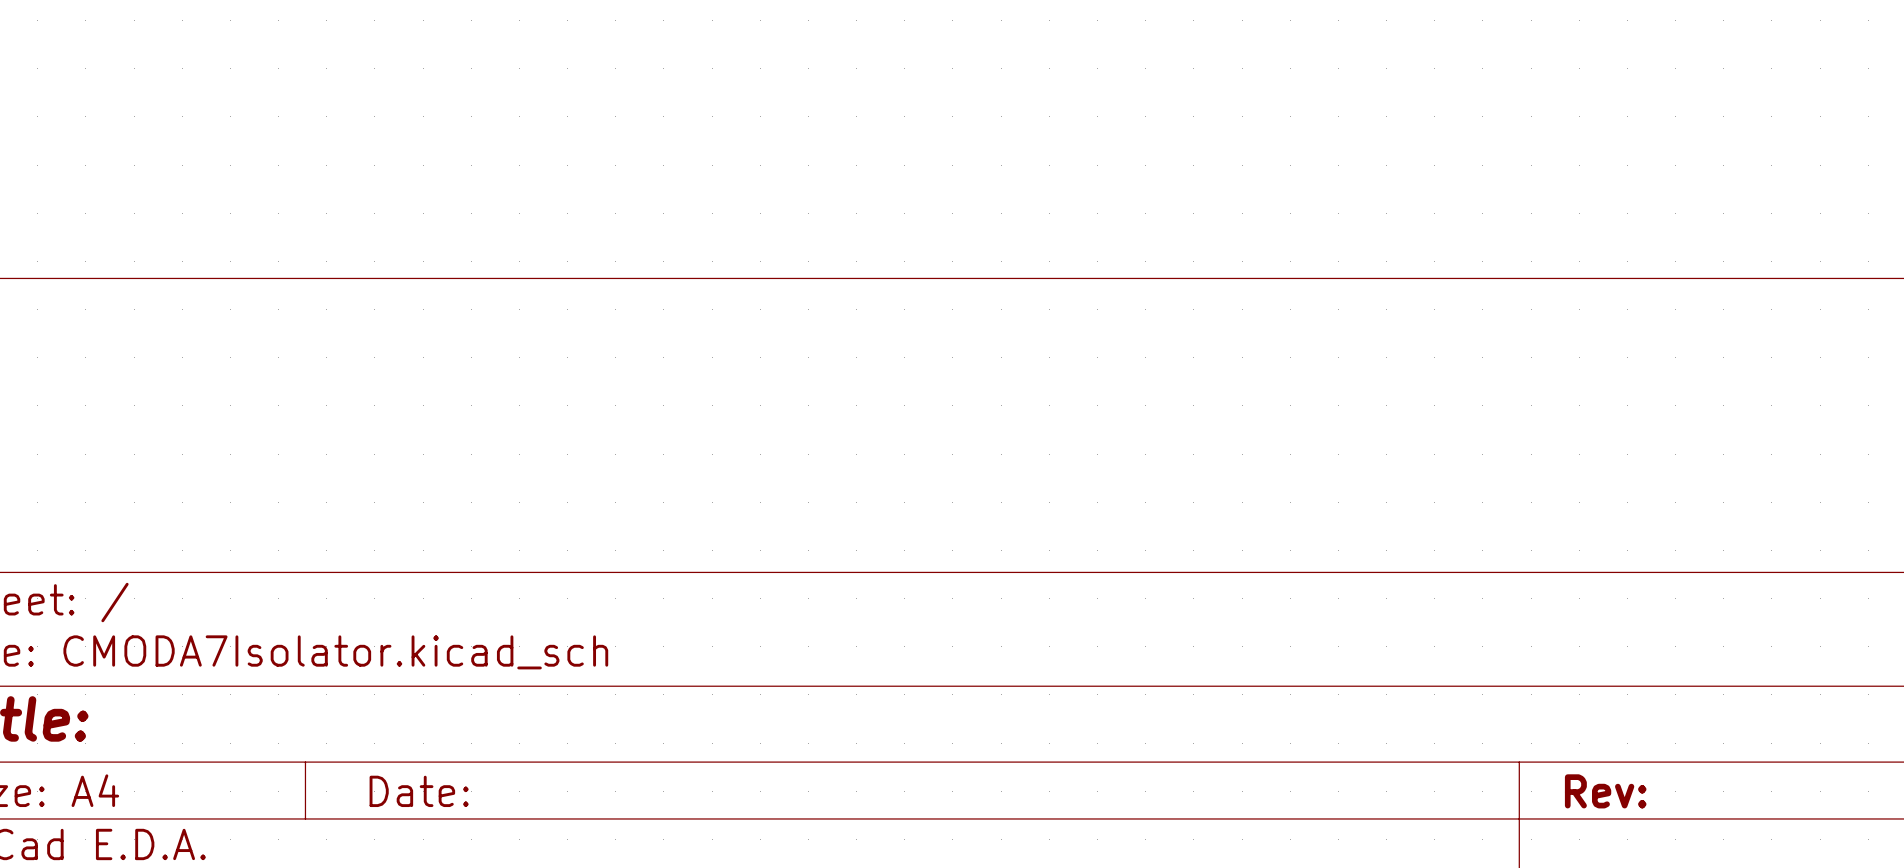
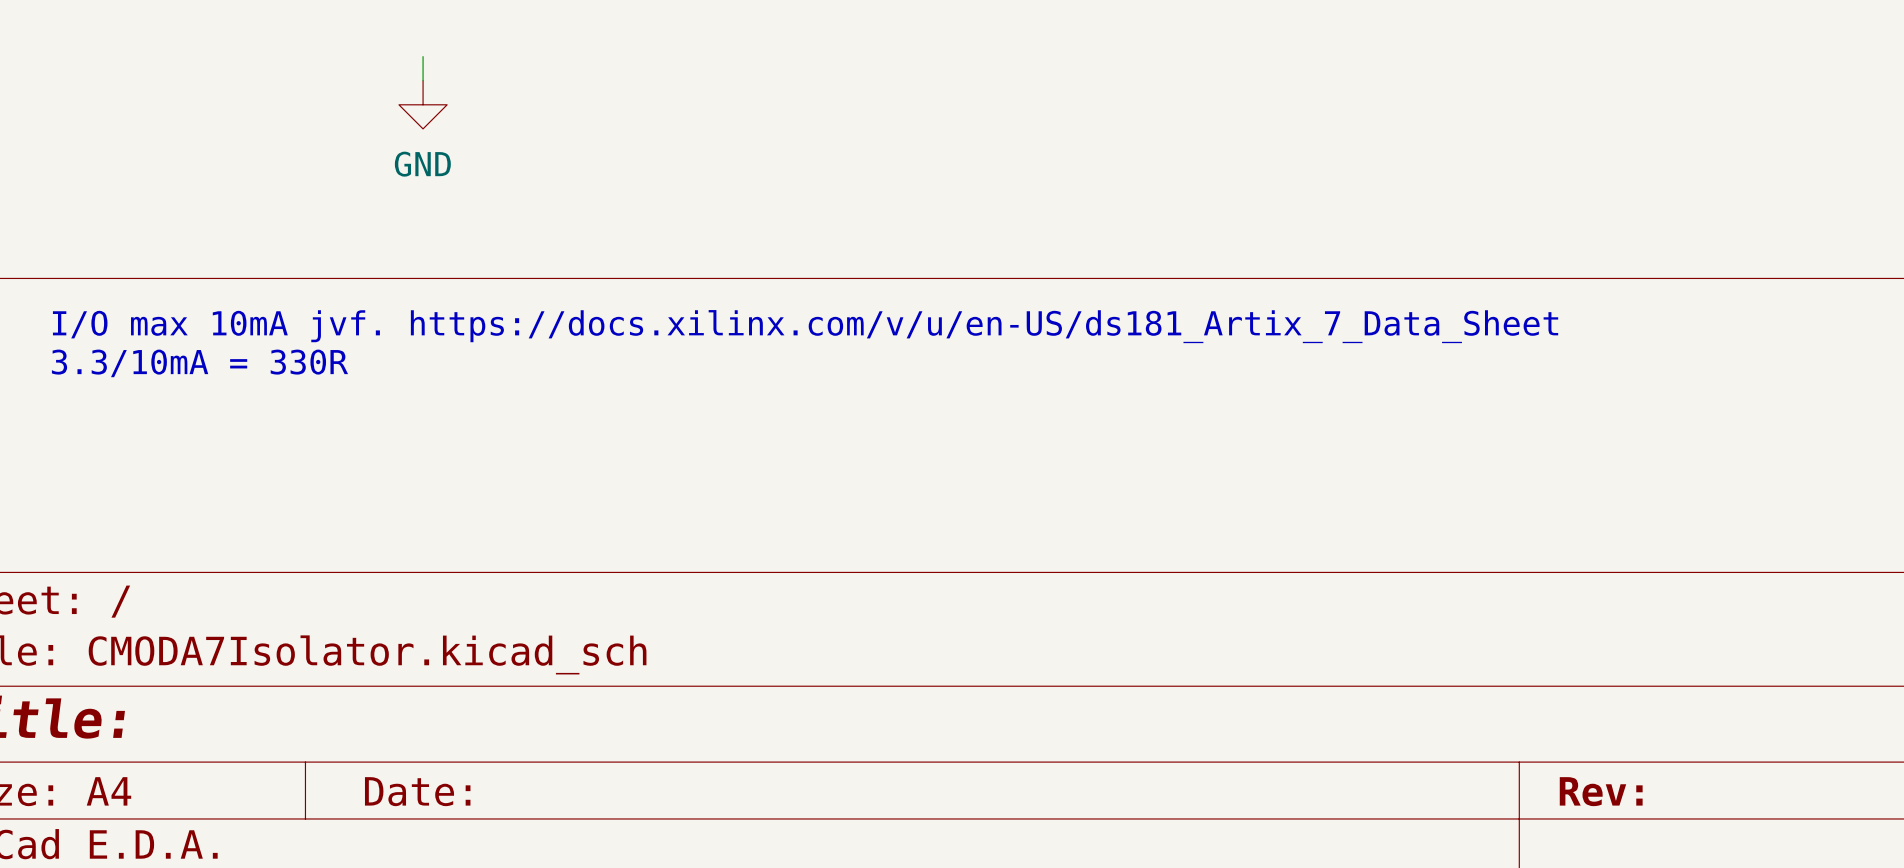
wire: none -> (423, 56) (423, 80)
power symbol: none -> GND (423, 104)
text: none -> I/O max 10mA jvf. https://docs.xilinx.com/v/u/en-US/ds181_Artix_7_Data_Sheet (805, 326)
text: none -> 3.3/10mA = 330R (199, 363)

